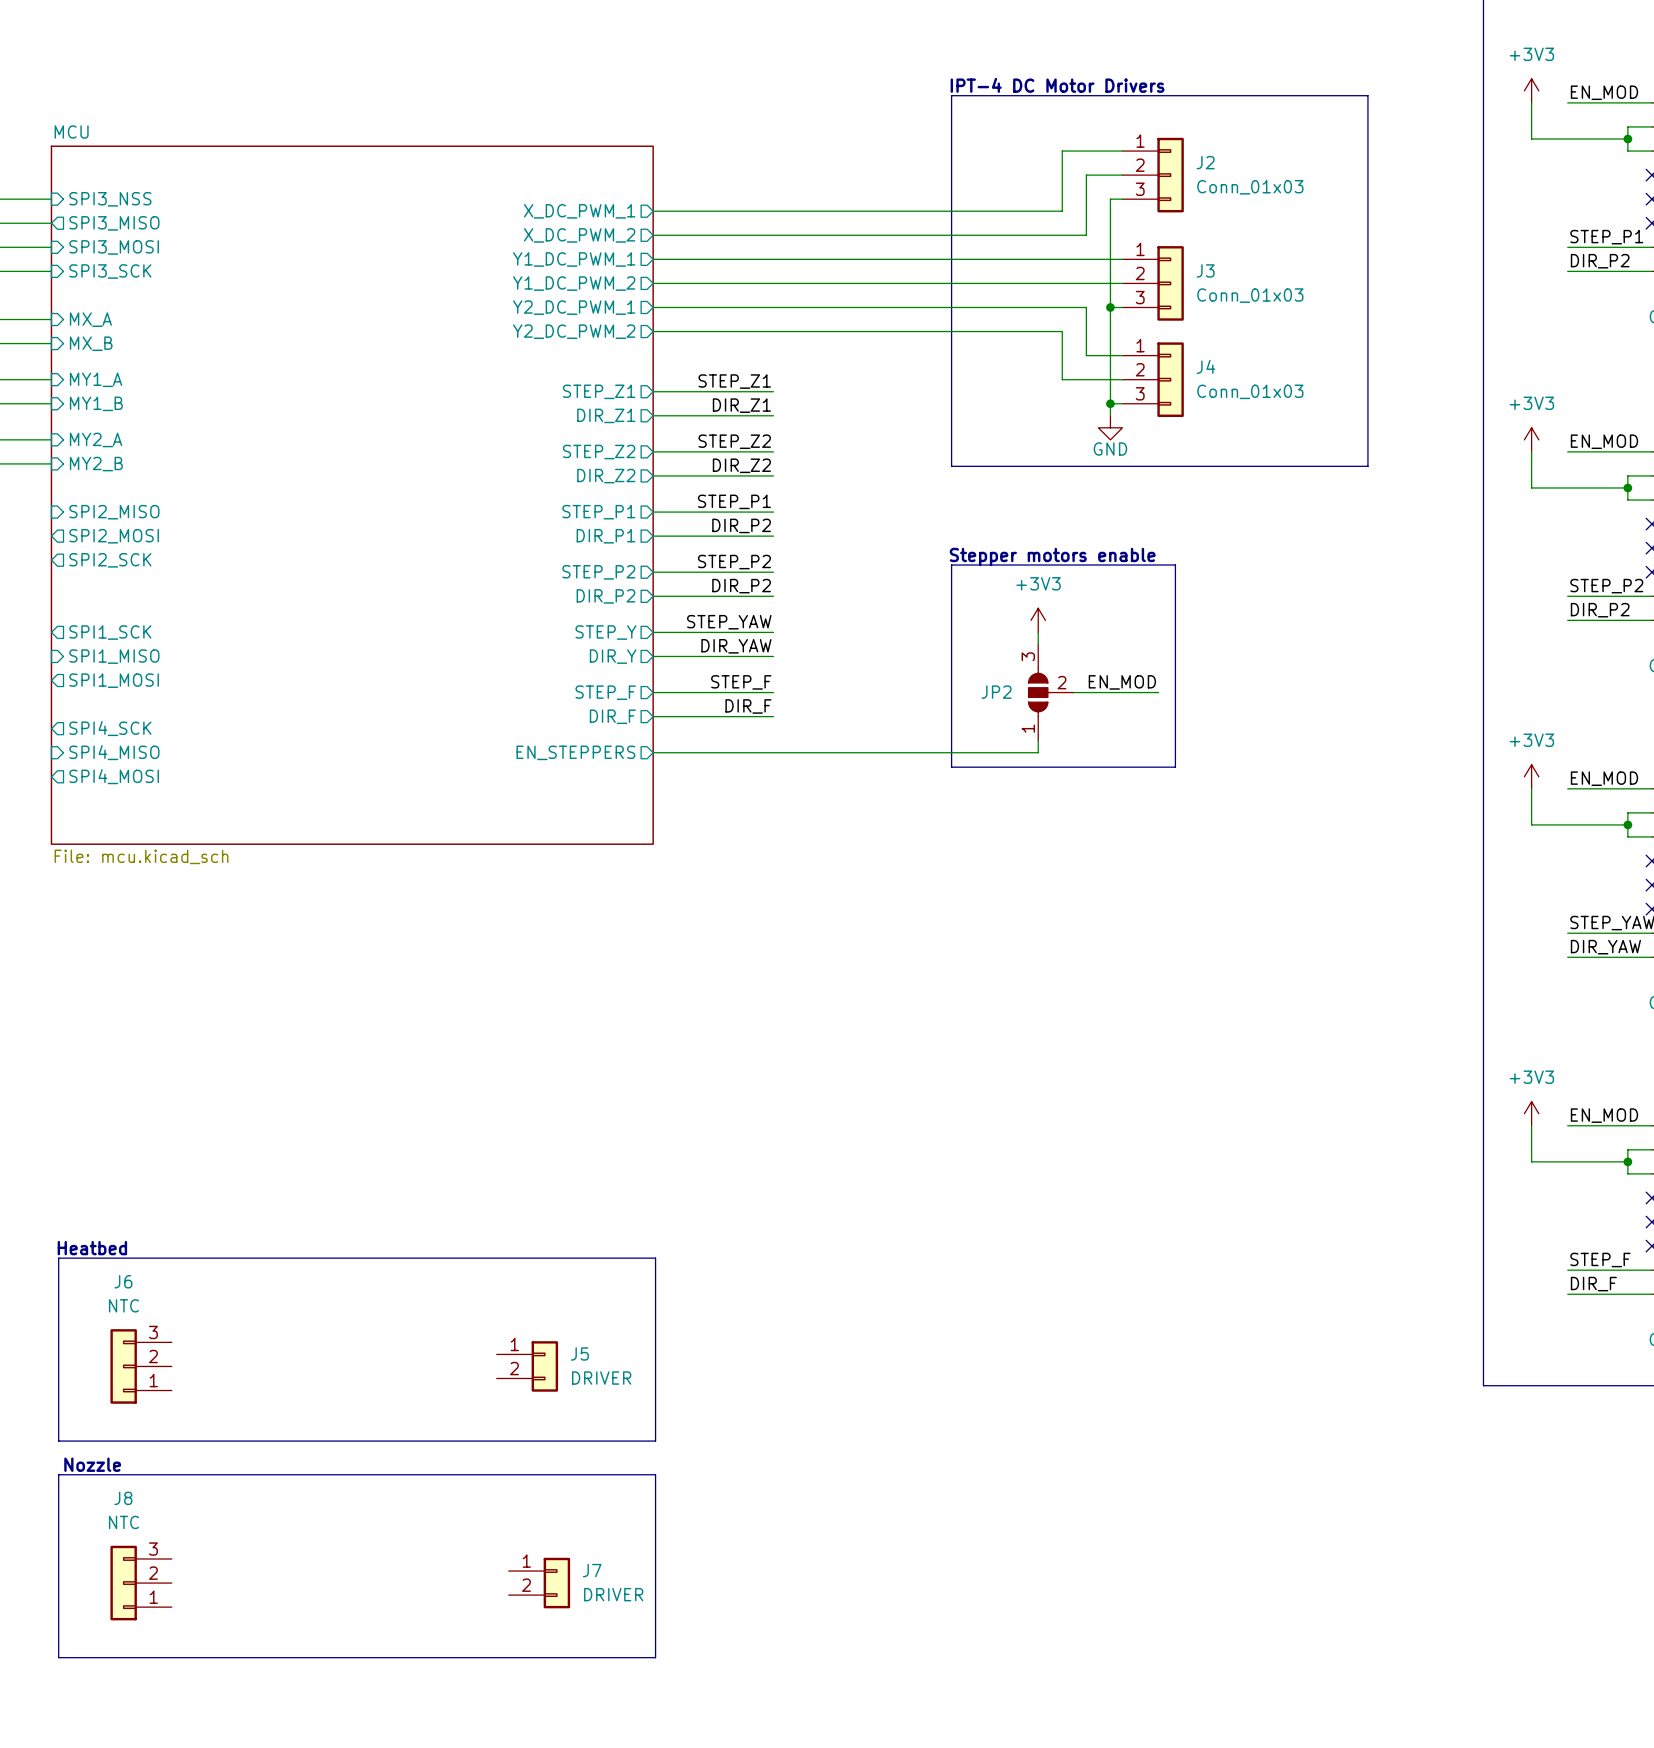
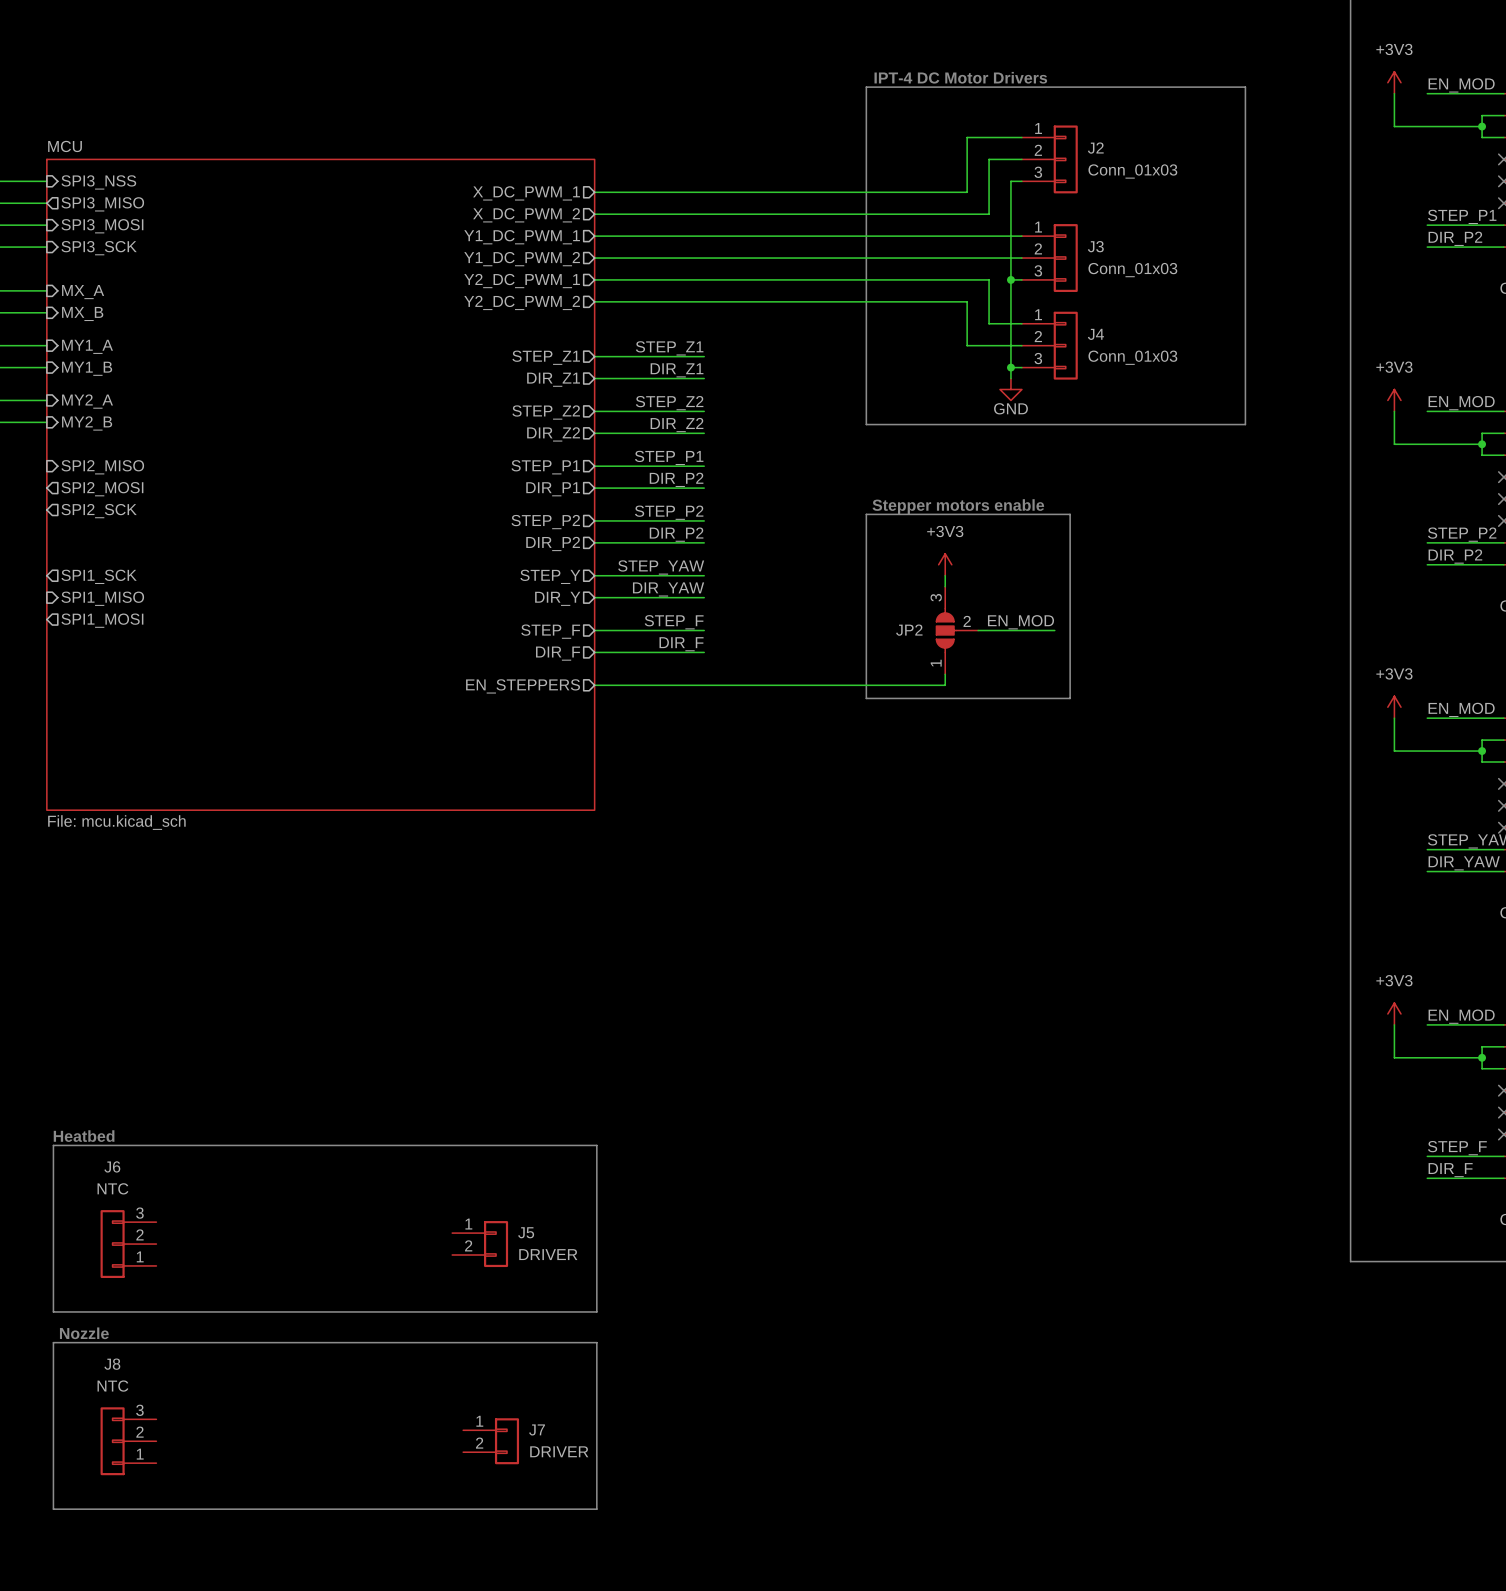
sheet MCU: File: mcu.kicad_sch (352, 495) -> none
sheet MCU: none -> File: mcu.kicad_sch (320, 484)
sheet pin: SPI4_SCK (110, 728) -> none
sheet pin: SPI4_MISO (114, 752) -> none
sheet pin: SPI4_MOSI (114, 776) -> none

